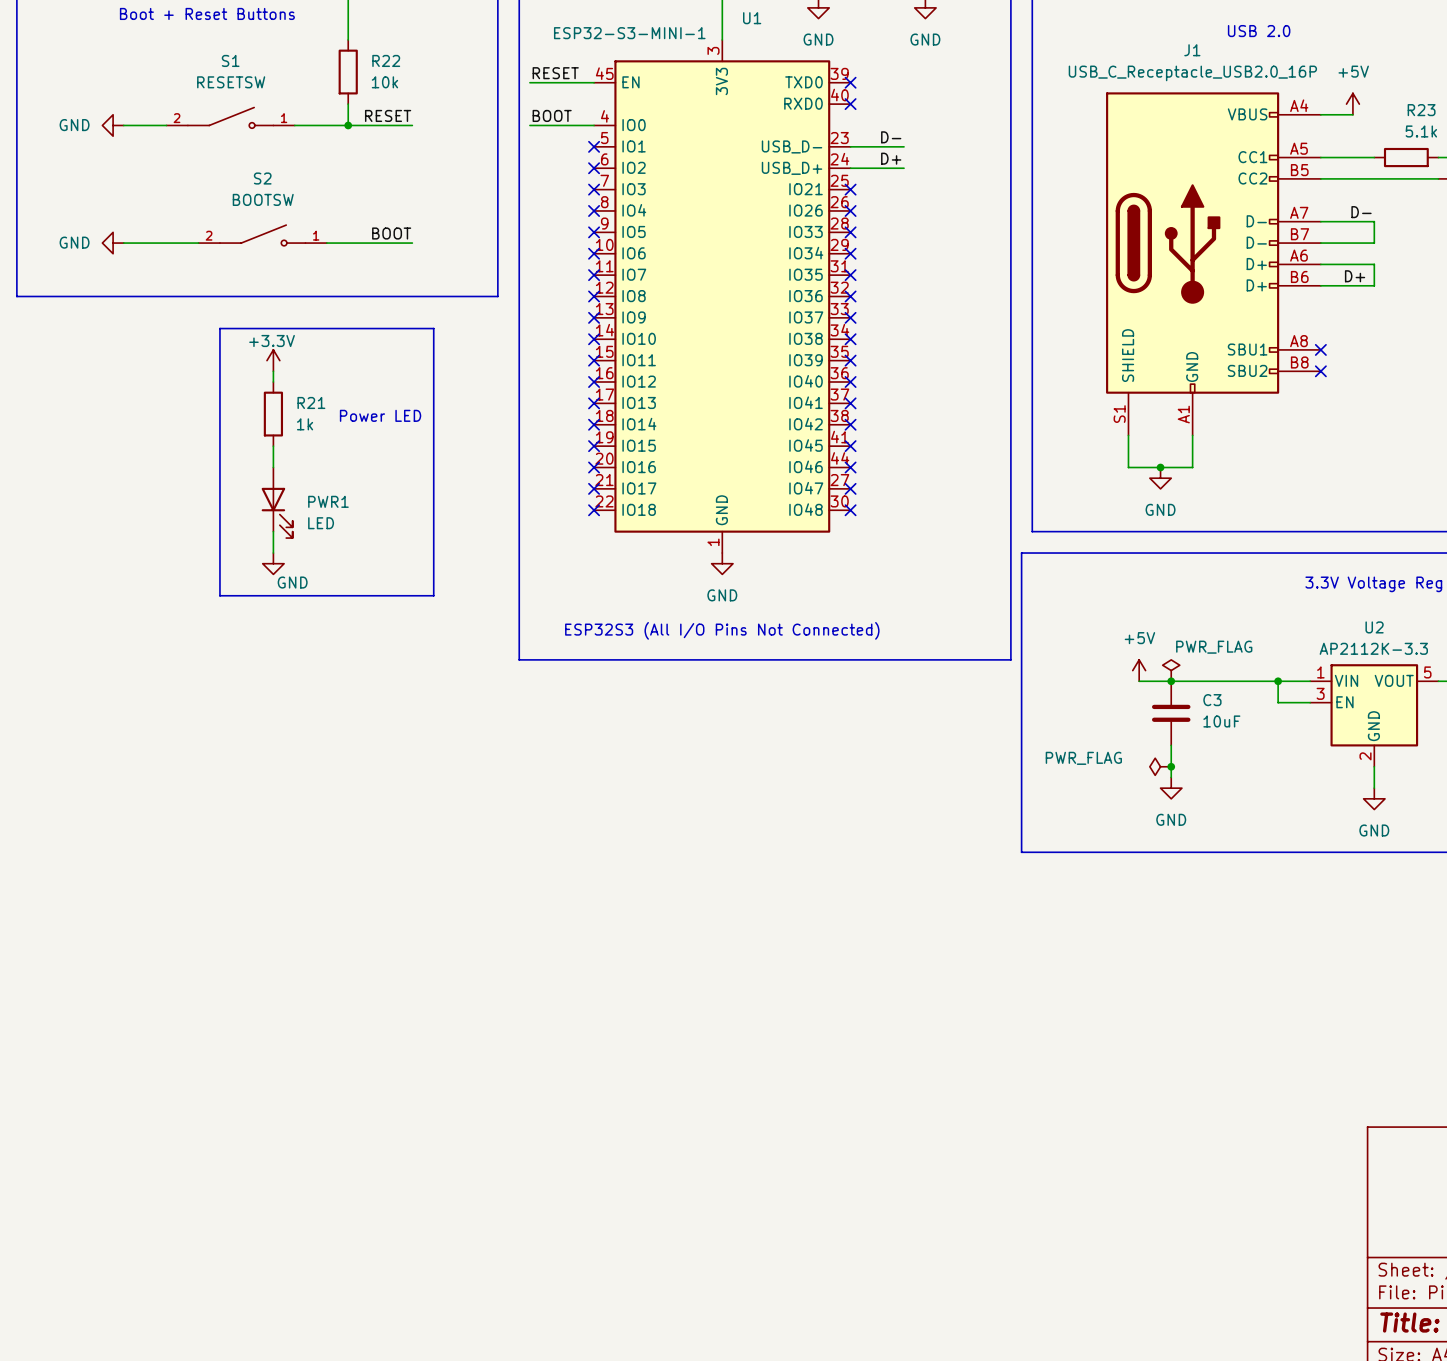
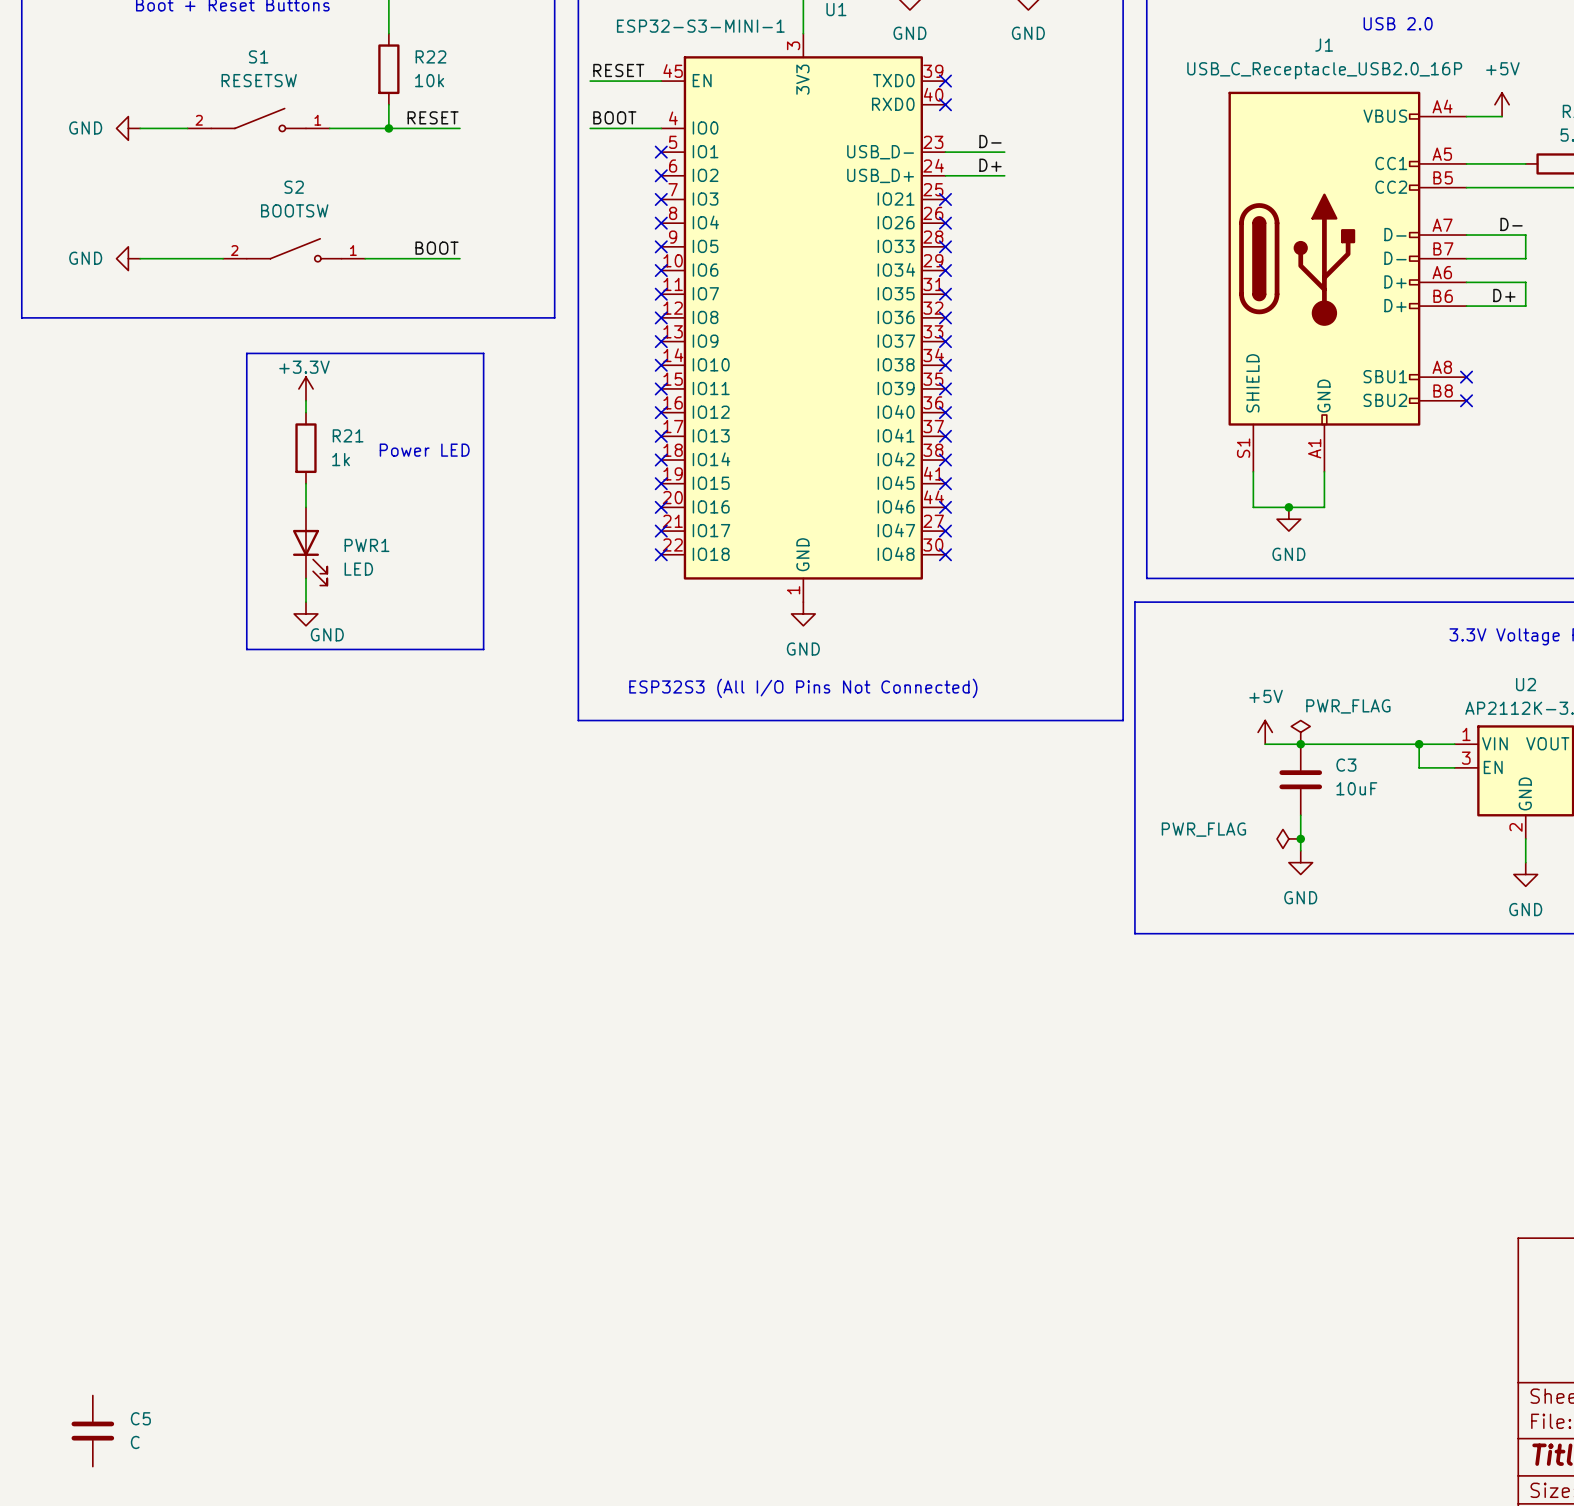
C5: none -> C (92, 1431)

